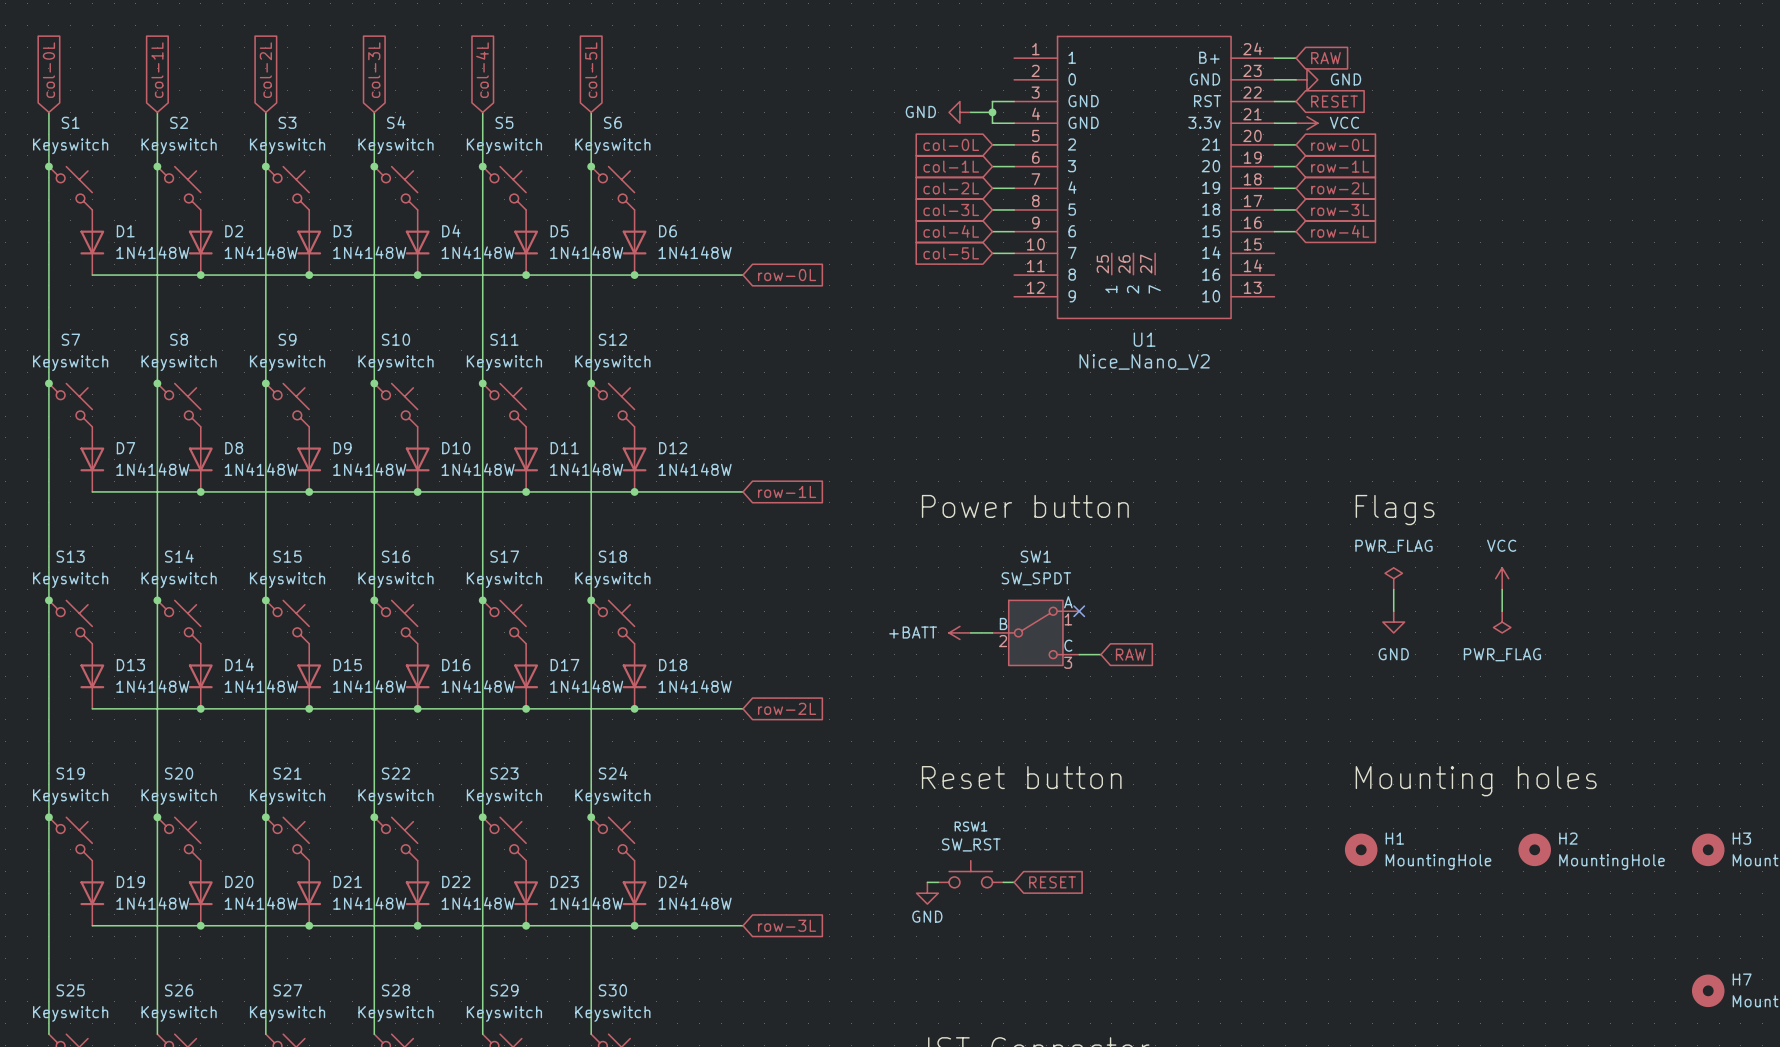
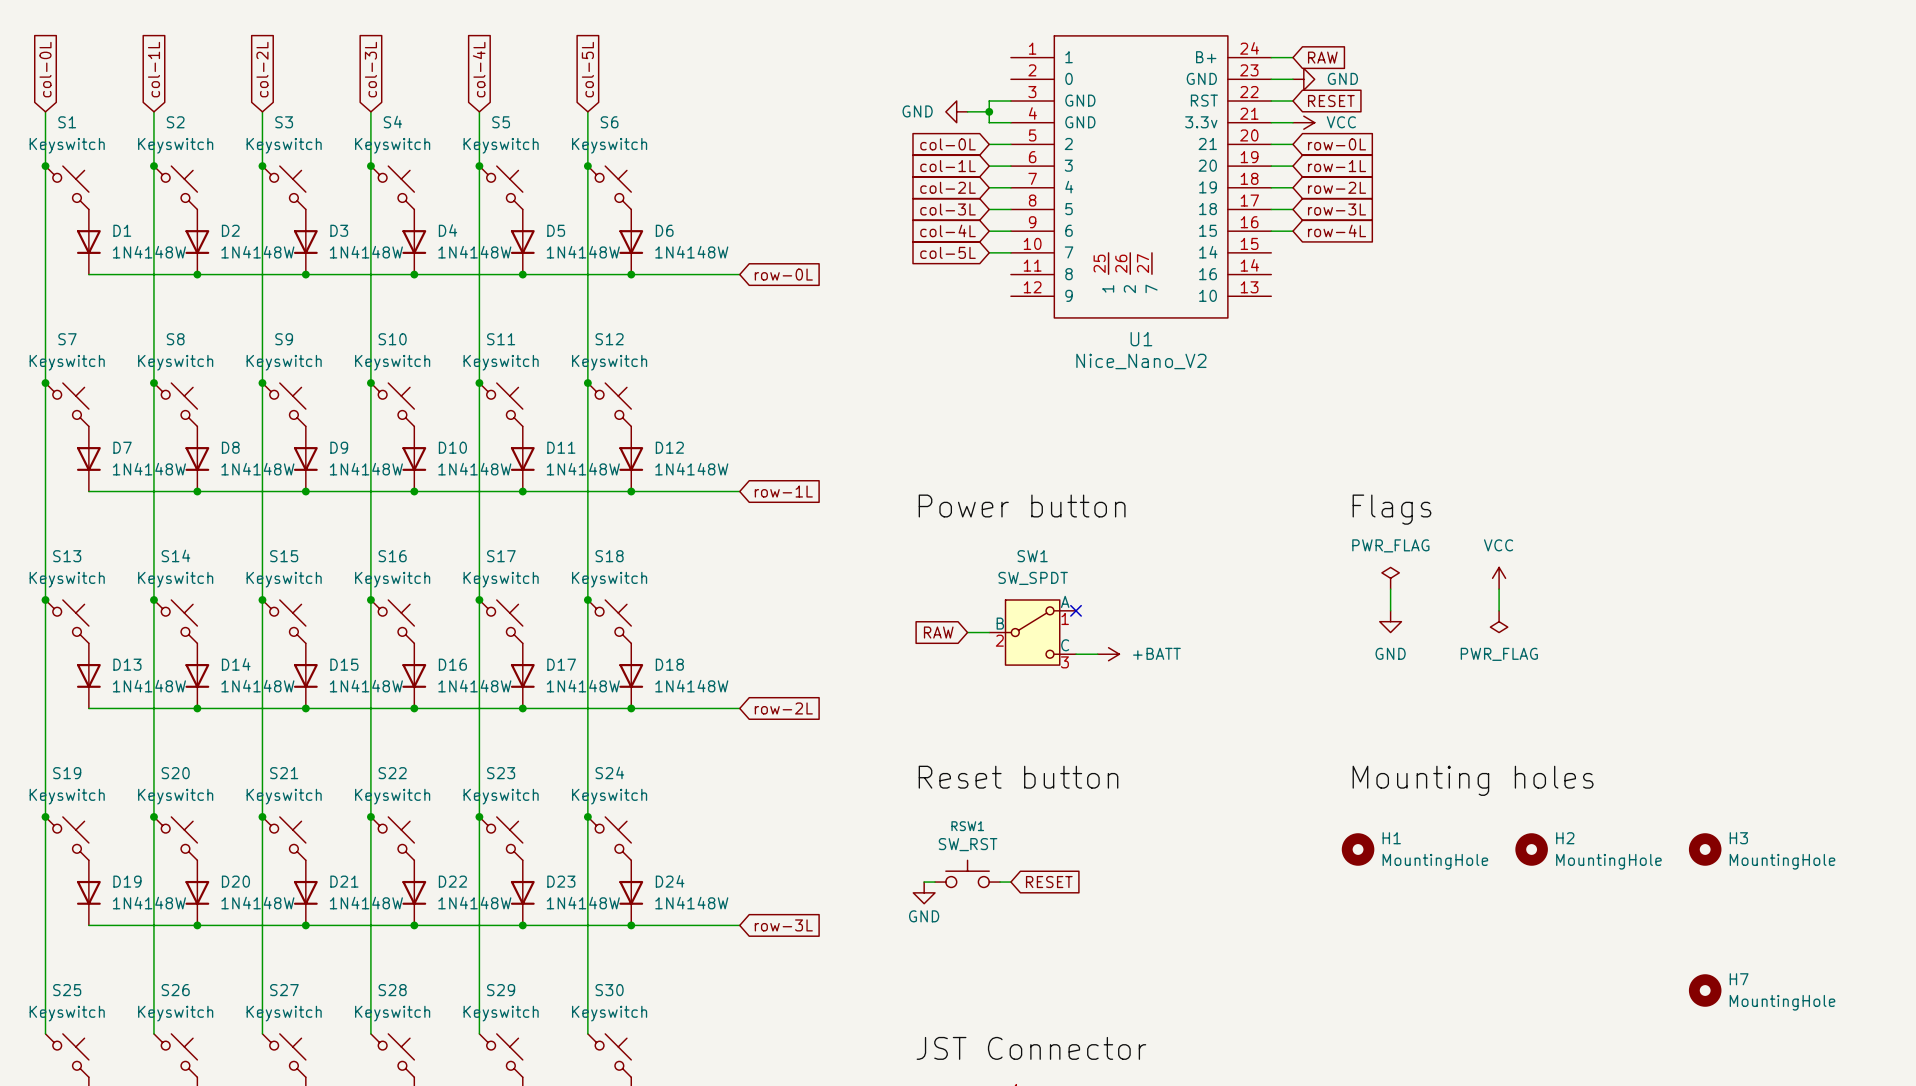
power symbol rotation: 0° (959, 632) -> 180° (1108, 654)
power symbol position: +BATT (959, 632) -> +BATT (1108, 654)
global label rotation: 0° (1130, 654) -> 180° (938, 632)
global label position: RAW (1130, 654) -> RAW (938, 632)

